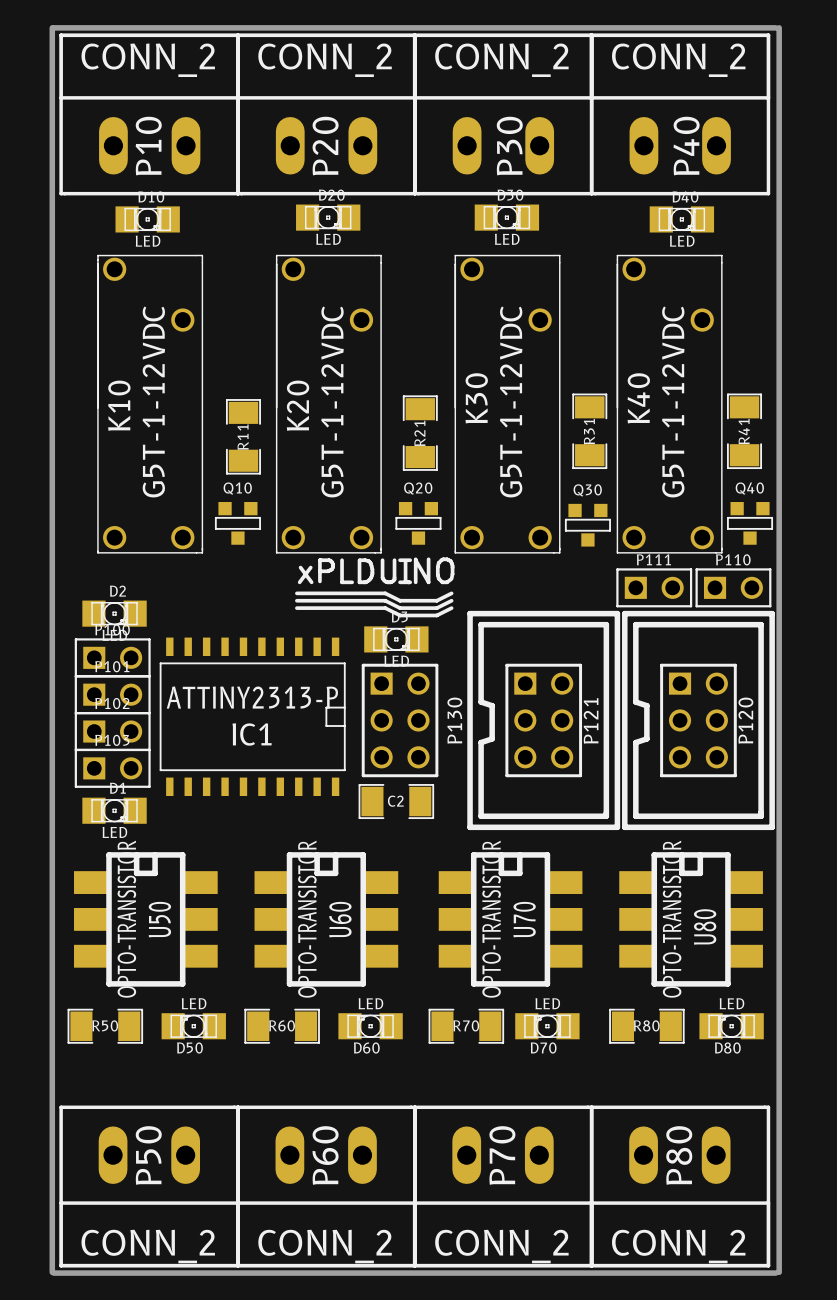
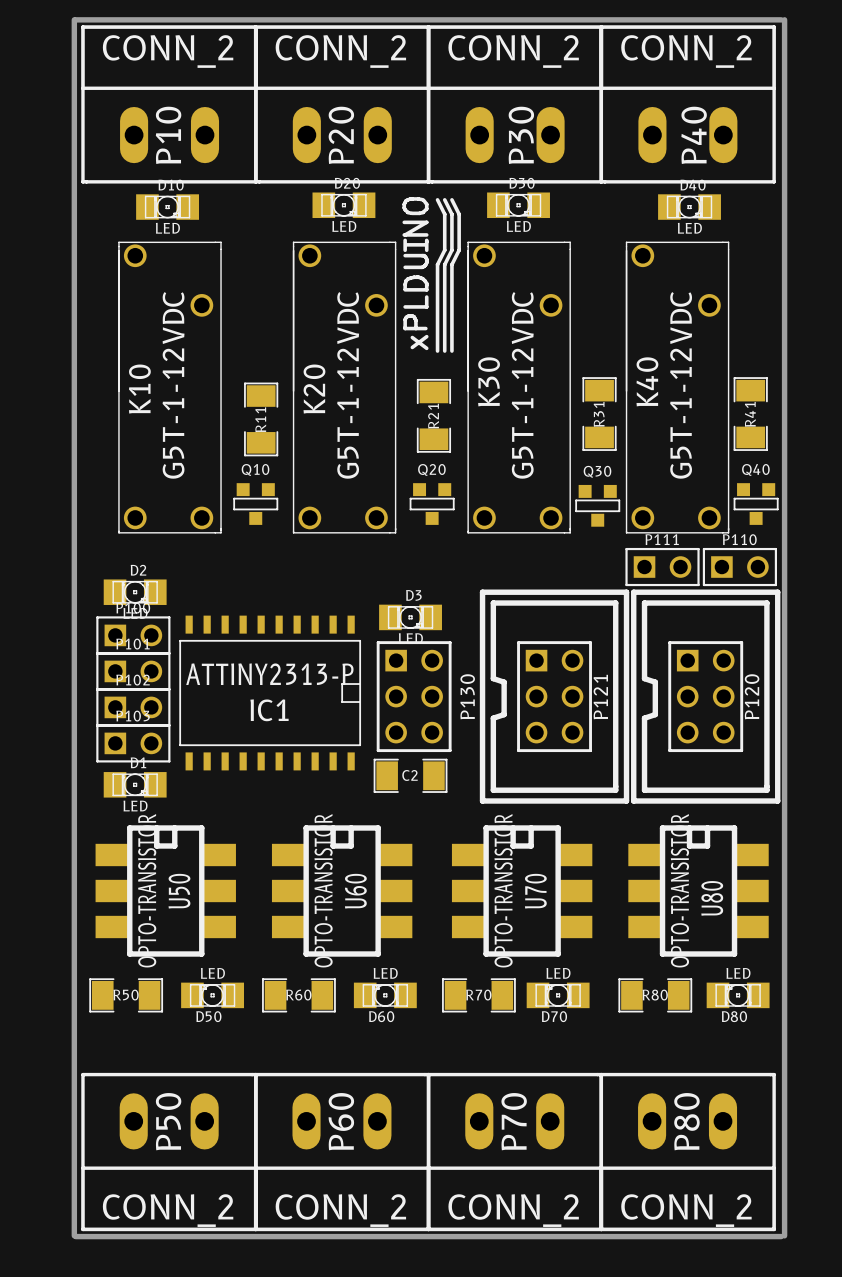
drawing: none -> [402, 197, 461, 353]
drawing: [295, 557, 455, 618] -> none

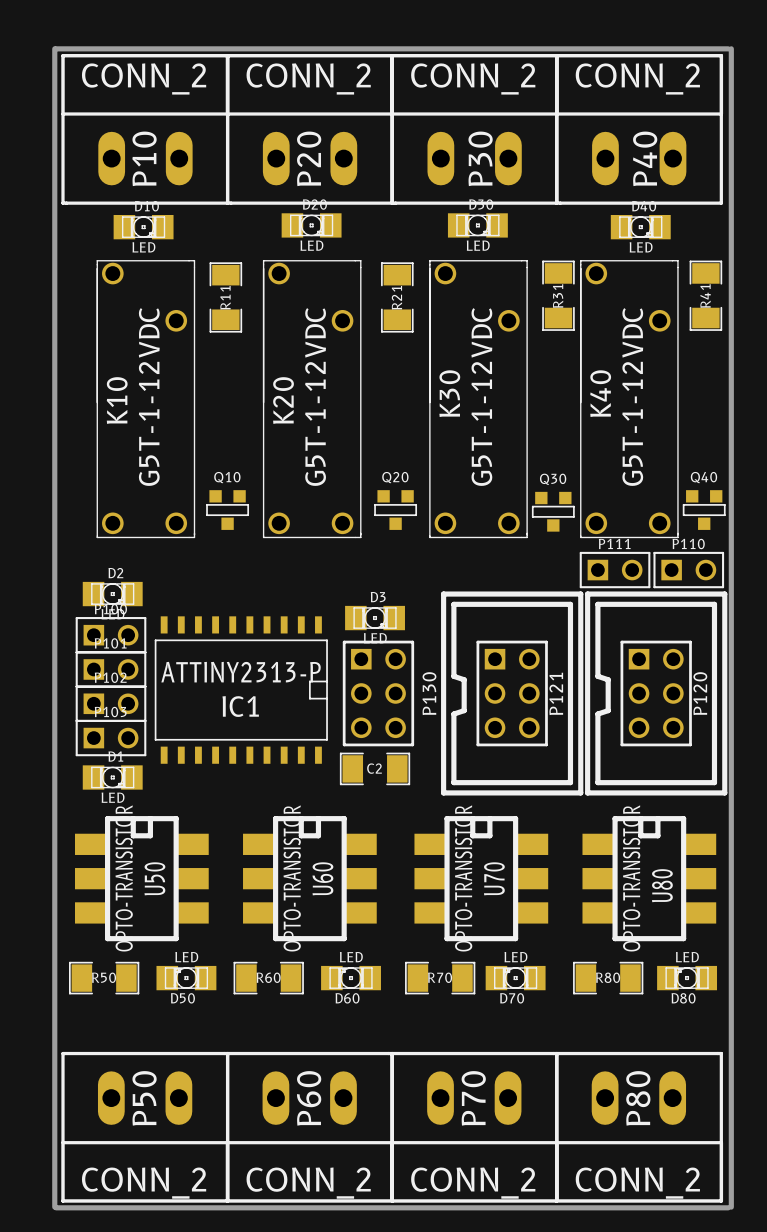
drawing: [402, 197, 461, 353] -> none
R31 position: (599, 414) -> (558, 295)
R41 position: (750, 414) -> (705, 295)
R21 position: (433, 415) -> (397, 297)
R11 position: (261, 419) -> (225, 297)

